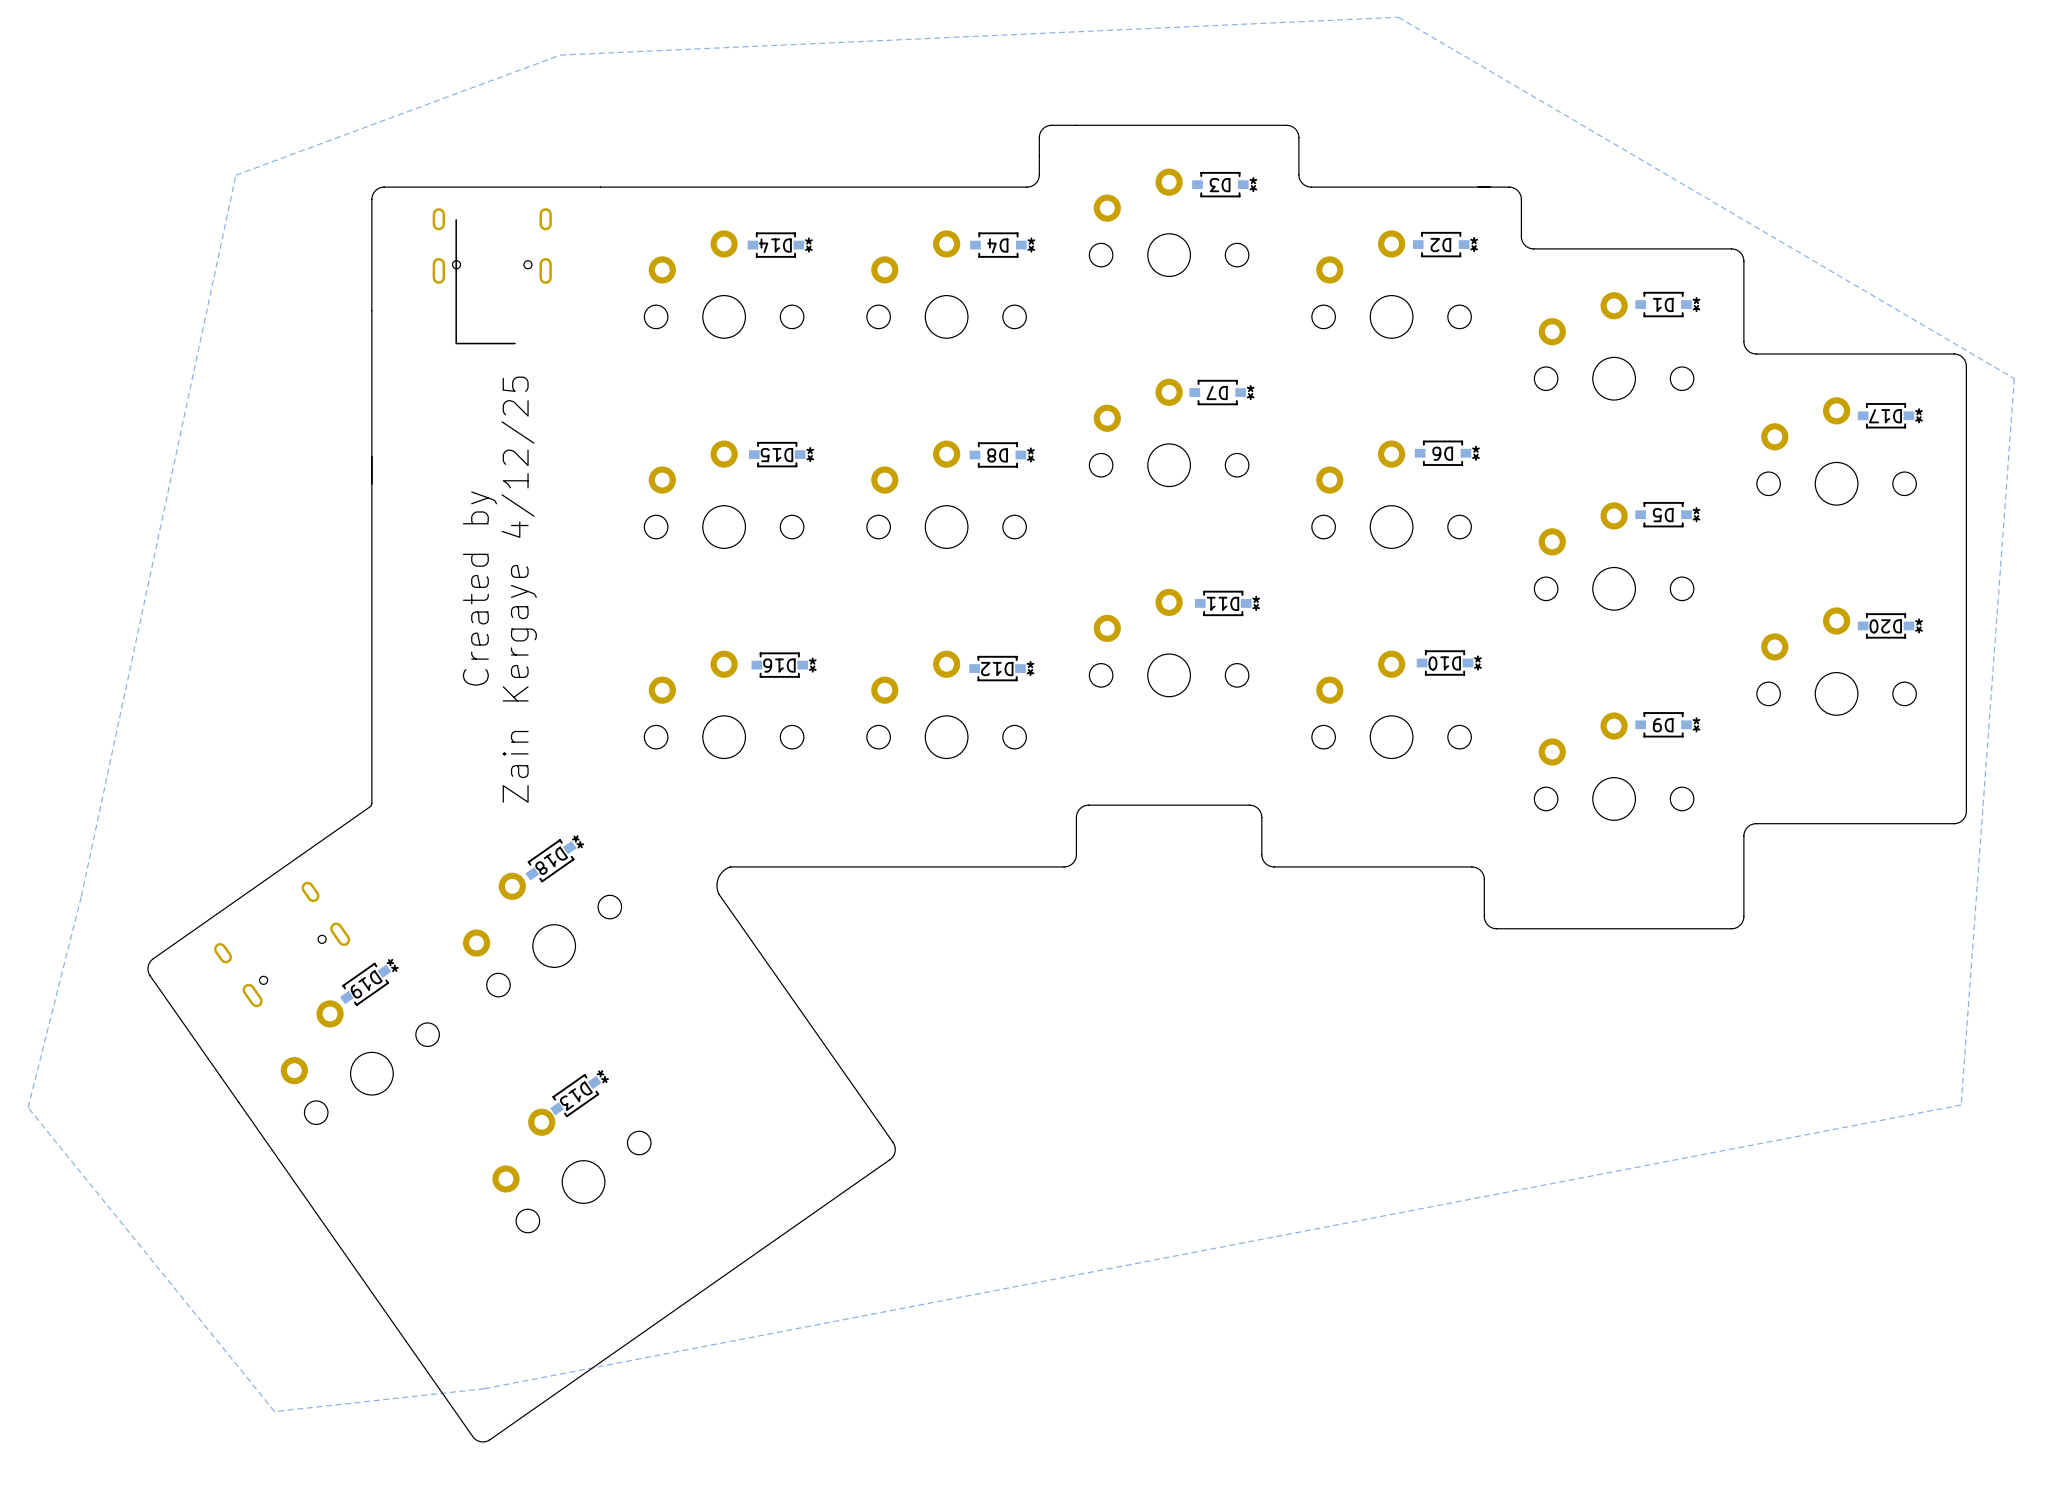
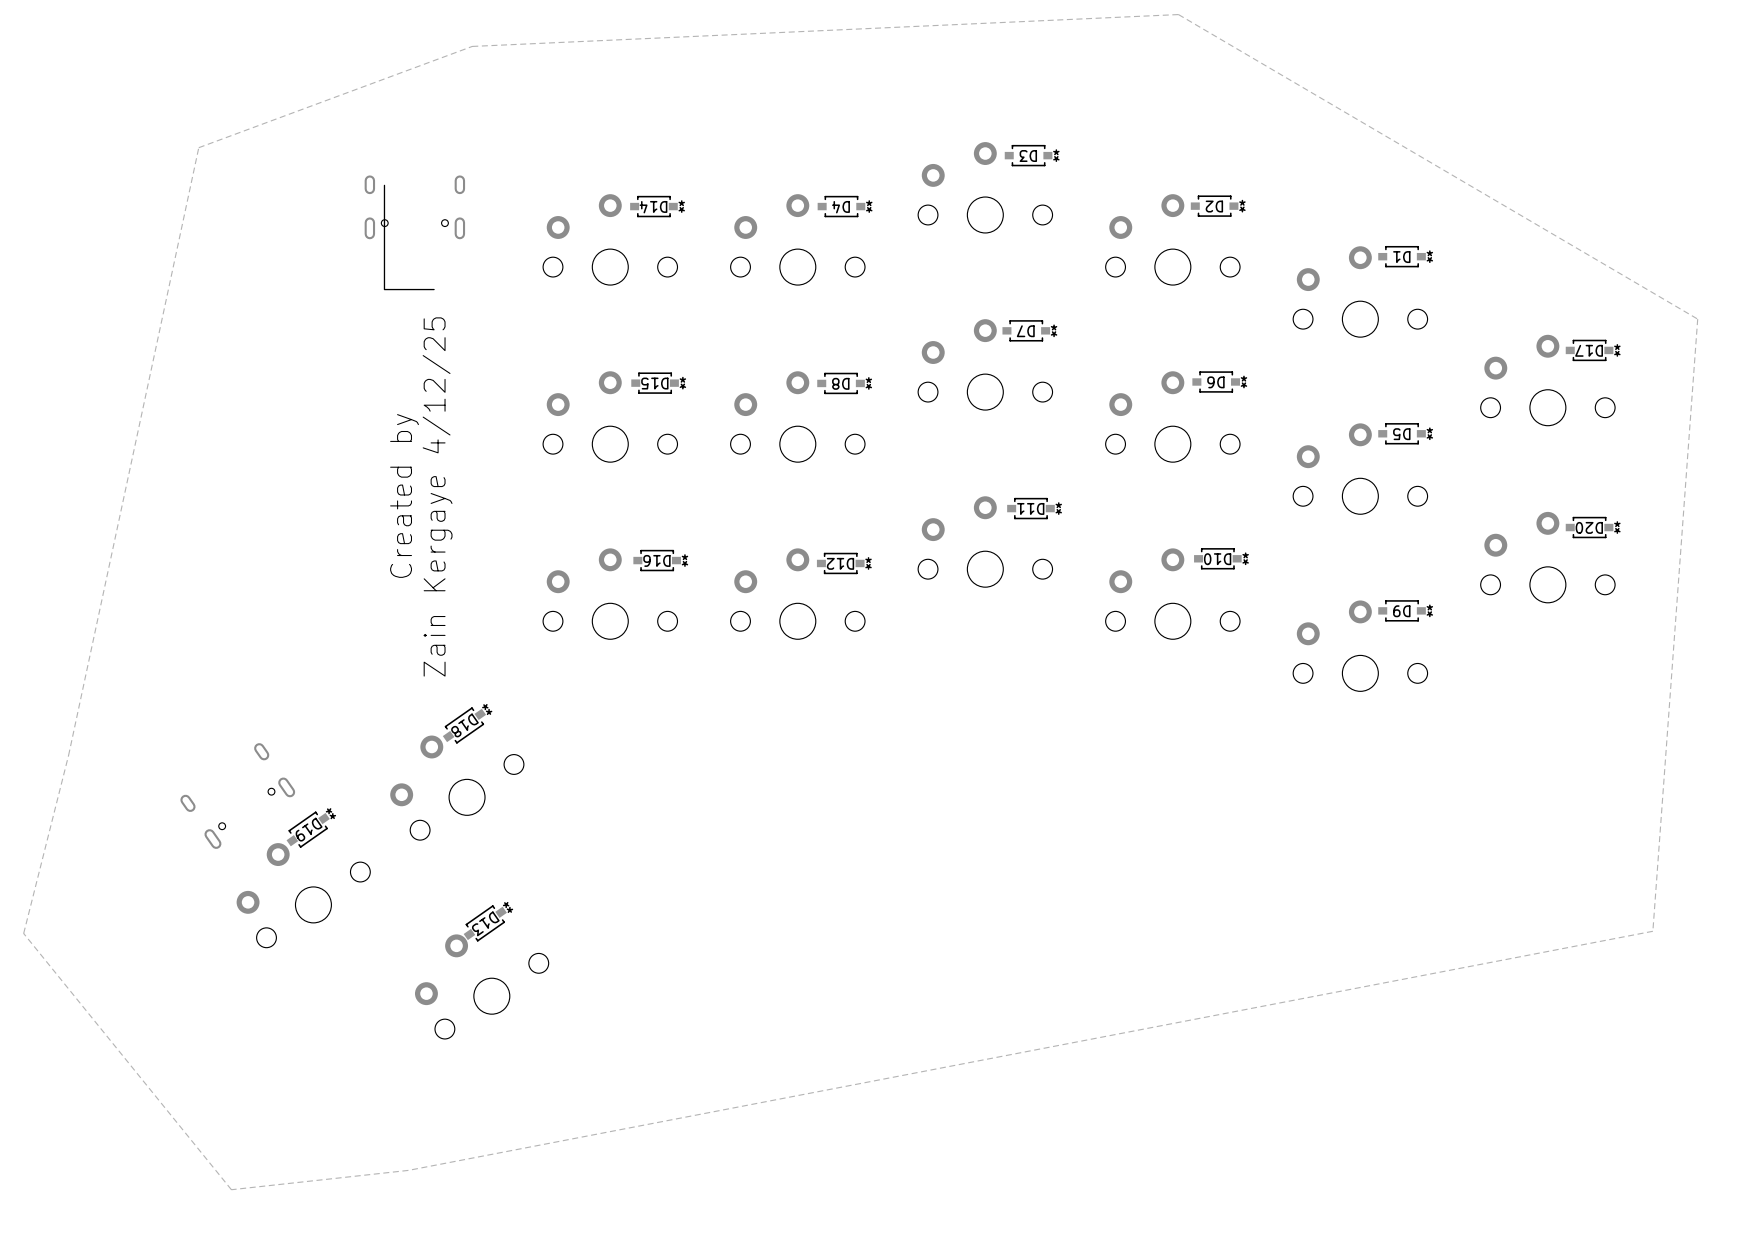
board edge: (1311, 187) (1511, 187) (1517, 190) (1521, 196) (1522, 240) (1526, 246) (1531, 248) (1731, 248) (1738, 250) (1743, 259) (1743, 343) (1746, 349) (1752, 353) (1954, 353) (1962, 357) (1966, 366) (1966, 811) (1964, 817) (1959, 822) (1954, 823) (1750, 824) (1746, 828) (1743, 834) (1743, 919) (1739, 926) (1731, 928) (1493, 928) (1487, 925) (1484, 919) (1484, 877) (1482, 872) (1477, 868) (1271, 866) (1265, 863) (1262, 857) (1261, 813) (1257, 807) (1250, 805) (1084, 805) (1079, 809) (1076, 816) (1075, 858) (1071, 864) (1065, 866) (728, 867) (722, 872) (717, 880) (719, 894) (893, 1142) (895, 1148) (894, 1154) (890, 1159) (490, 1439) (480, 1441) (472, 1436) -> none
board edge: (1311, 187) (1303, 184) (1299, 178) (1298, 134) (1295, 128) (1289, 125) (1051, 125) (1045, 127) (1040, 133) (1039, 177) (1034, 184) (1028, 187) (384, 187) (378, 188) (373, 192) (371, 199) (371, 804) (153, 958) (149, 962) (147, 969) (150, 975) (472, 1436) -> none

